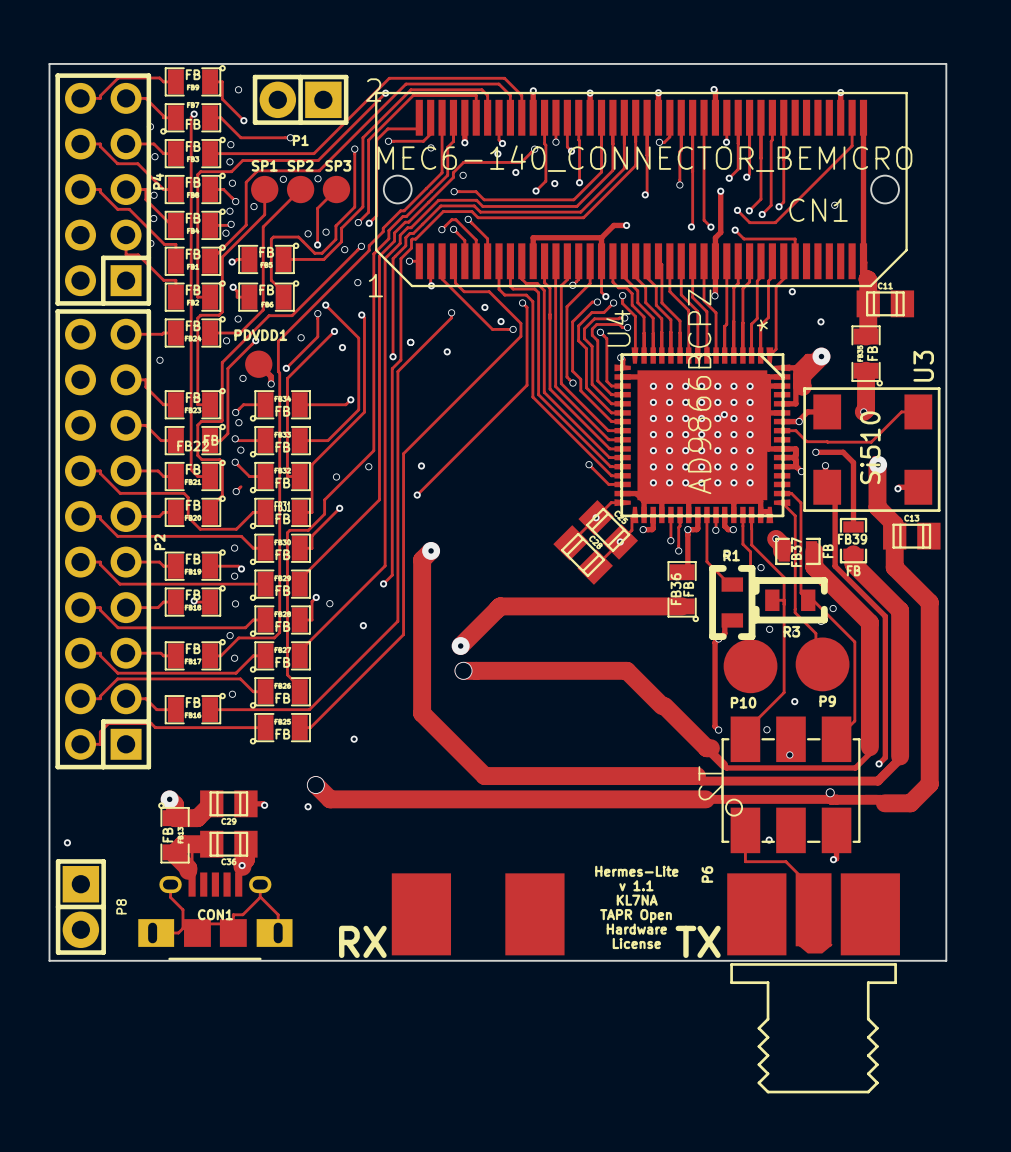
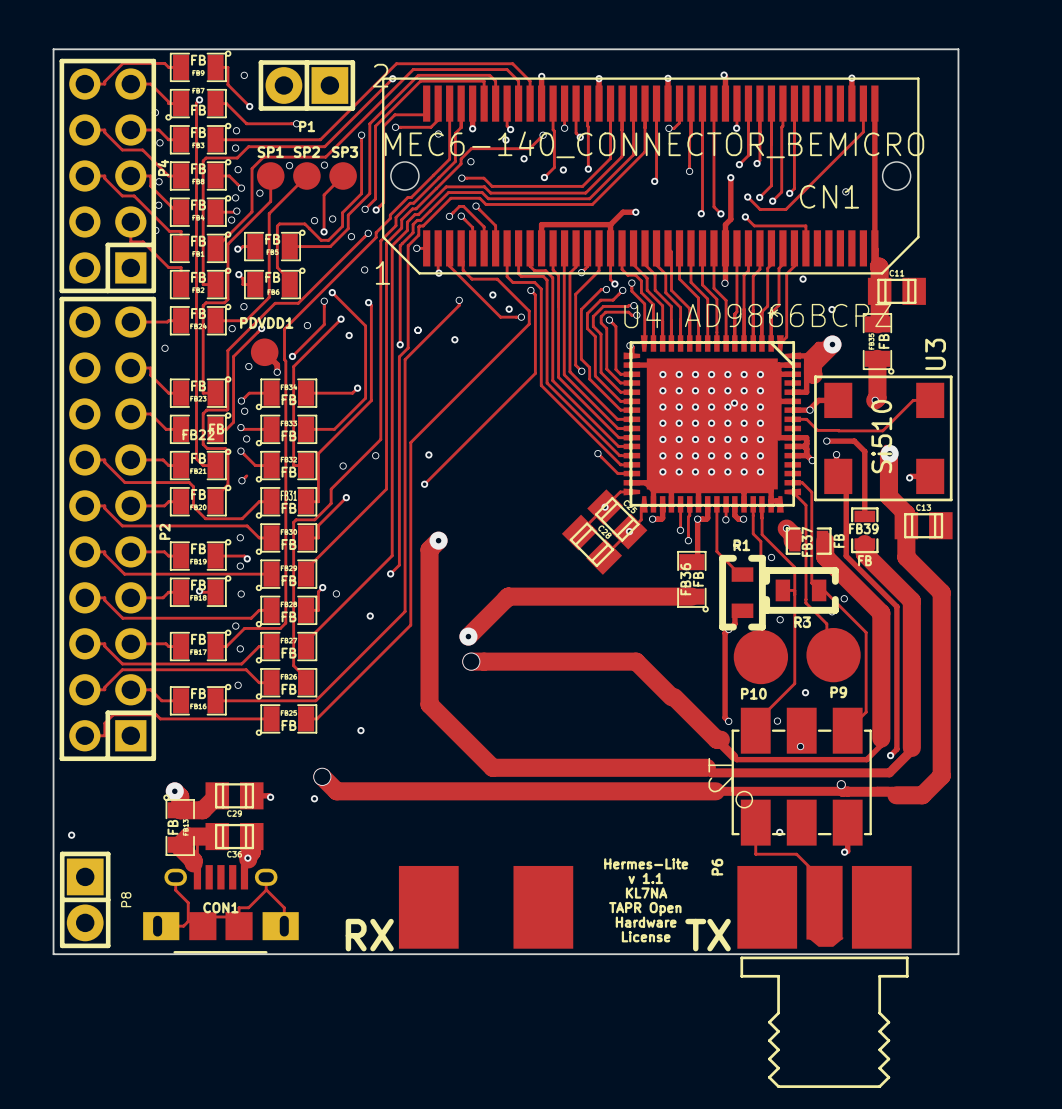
U4 name rotation: 0° (618, 328) -> 90° clockwise (642, 316)
U4 value rotation: 0° (699, 391) -> 90° clockwise (788, 315)

